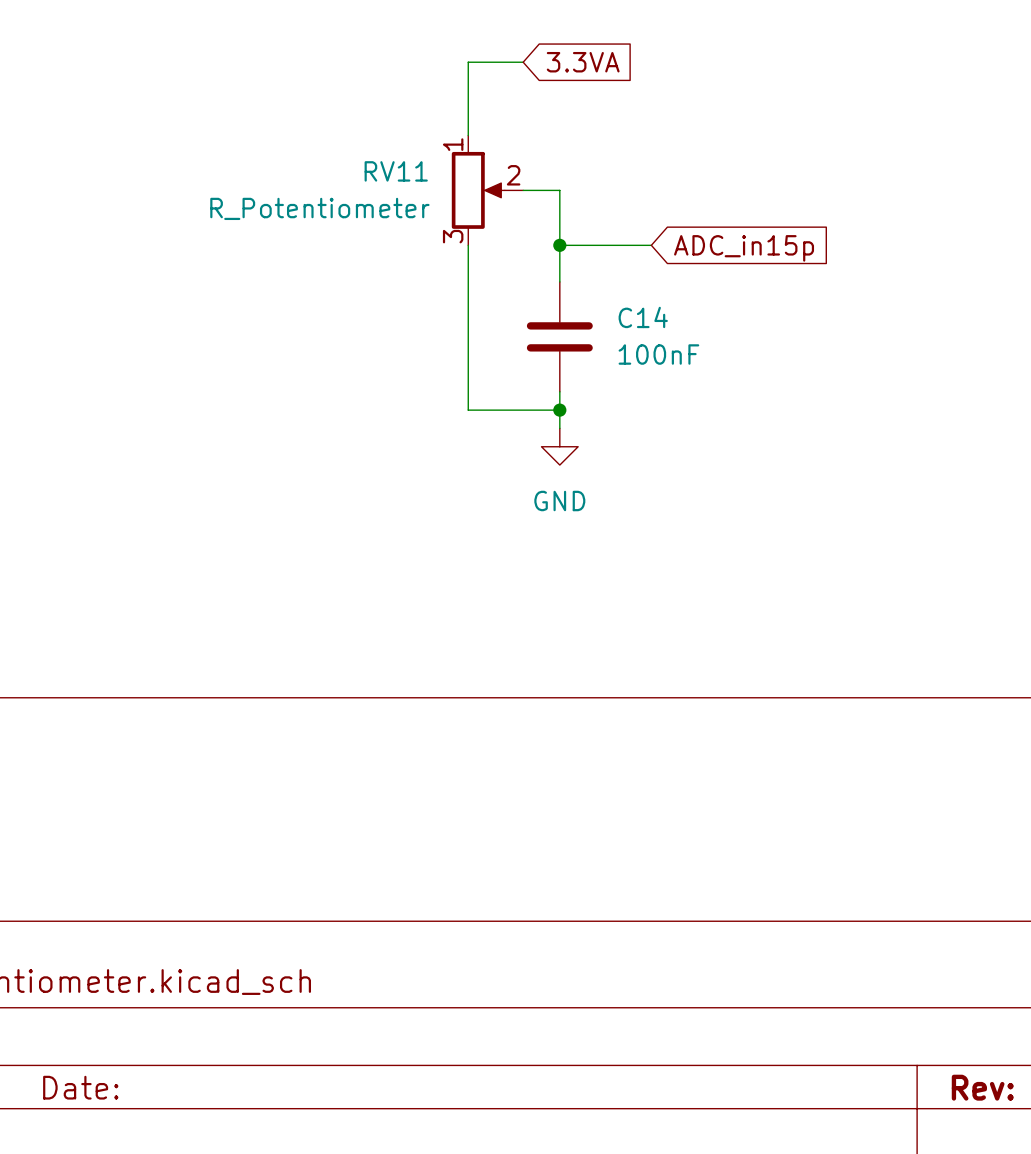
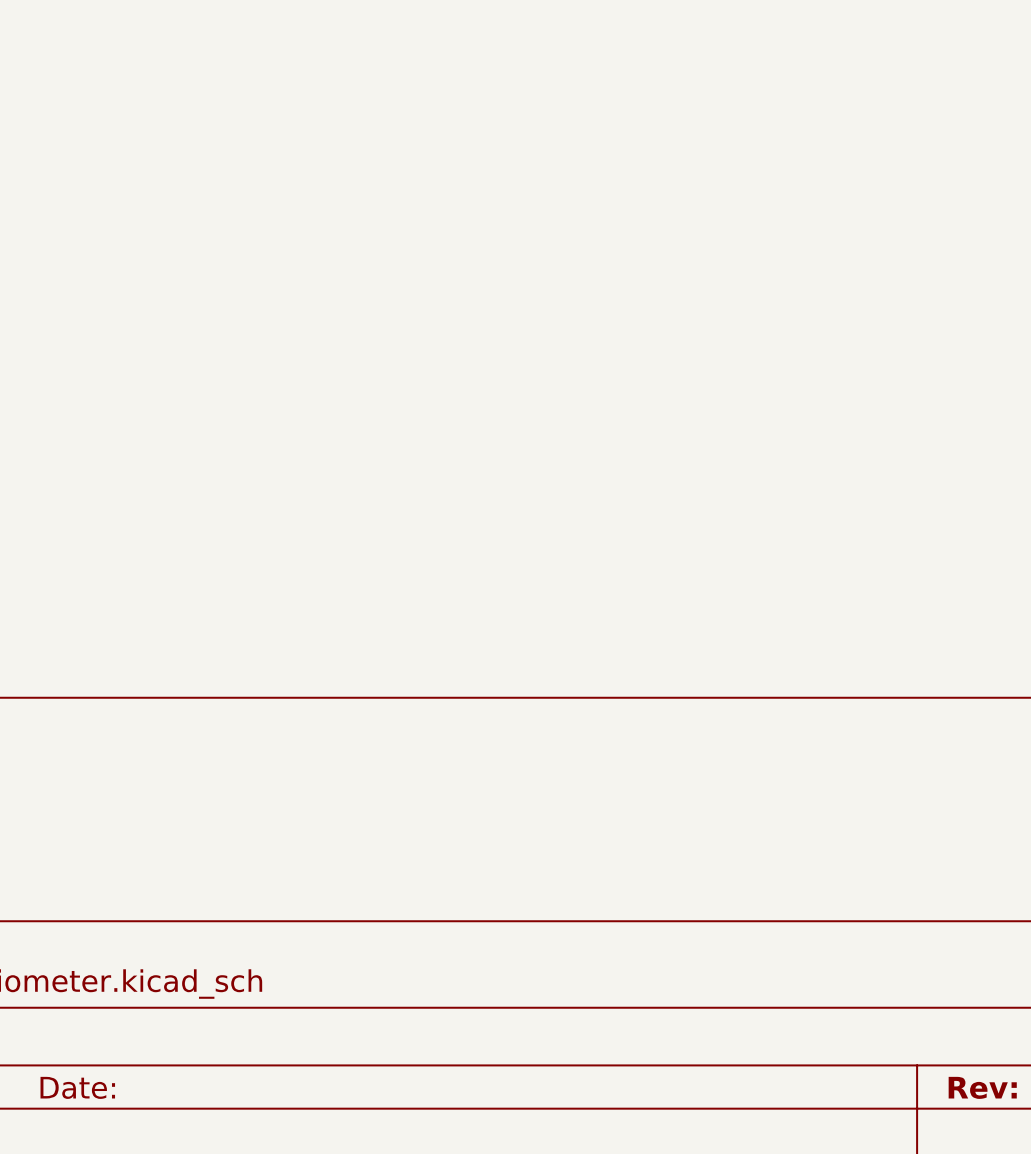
wire: (523, 62) (468, 62) (468, 135) -> none
global label: 3.3VA (583, 62) -> none
RV11: R_Potentiometer (487, 190) -> none
wire: (523, 190) (559, 190) (559, 281) -> none
wire: (468, 245) (468, 410) (559, 410) -> none
wire: (559, 245) (651, 245) -> none
junction: (559, 245) -> none
global label: ADC_in15p (744, 248) -> none
C14: 100nF (559, 336) -> none
wire: (559, 391) (559, 428) -> none
junction: (559, 410) -> none
power symbol: GND (559, 446) -> none

